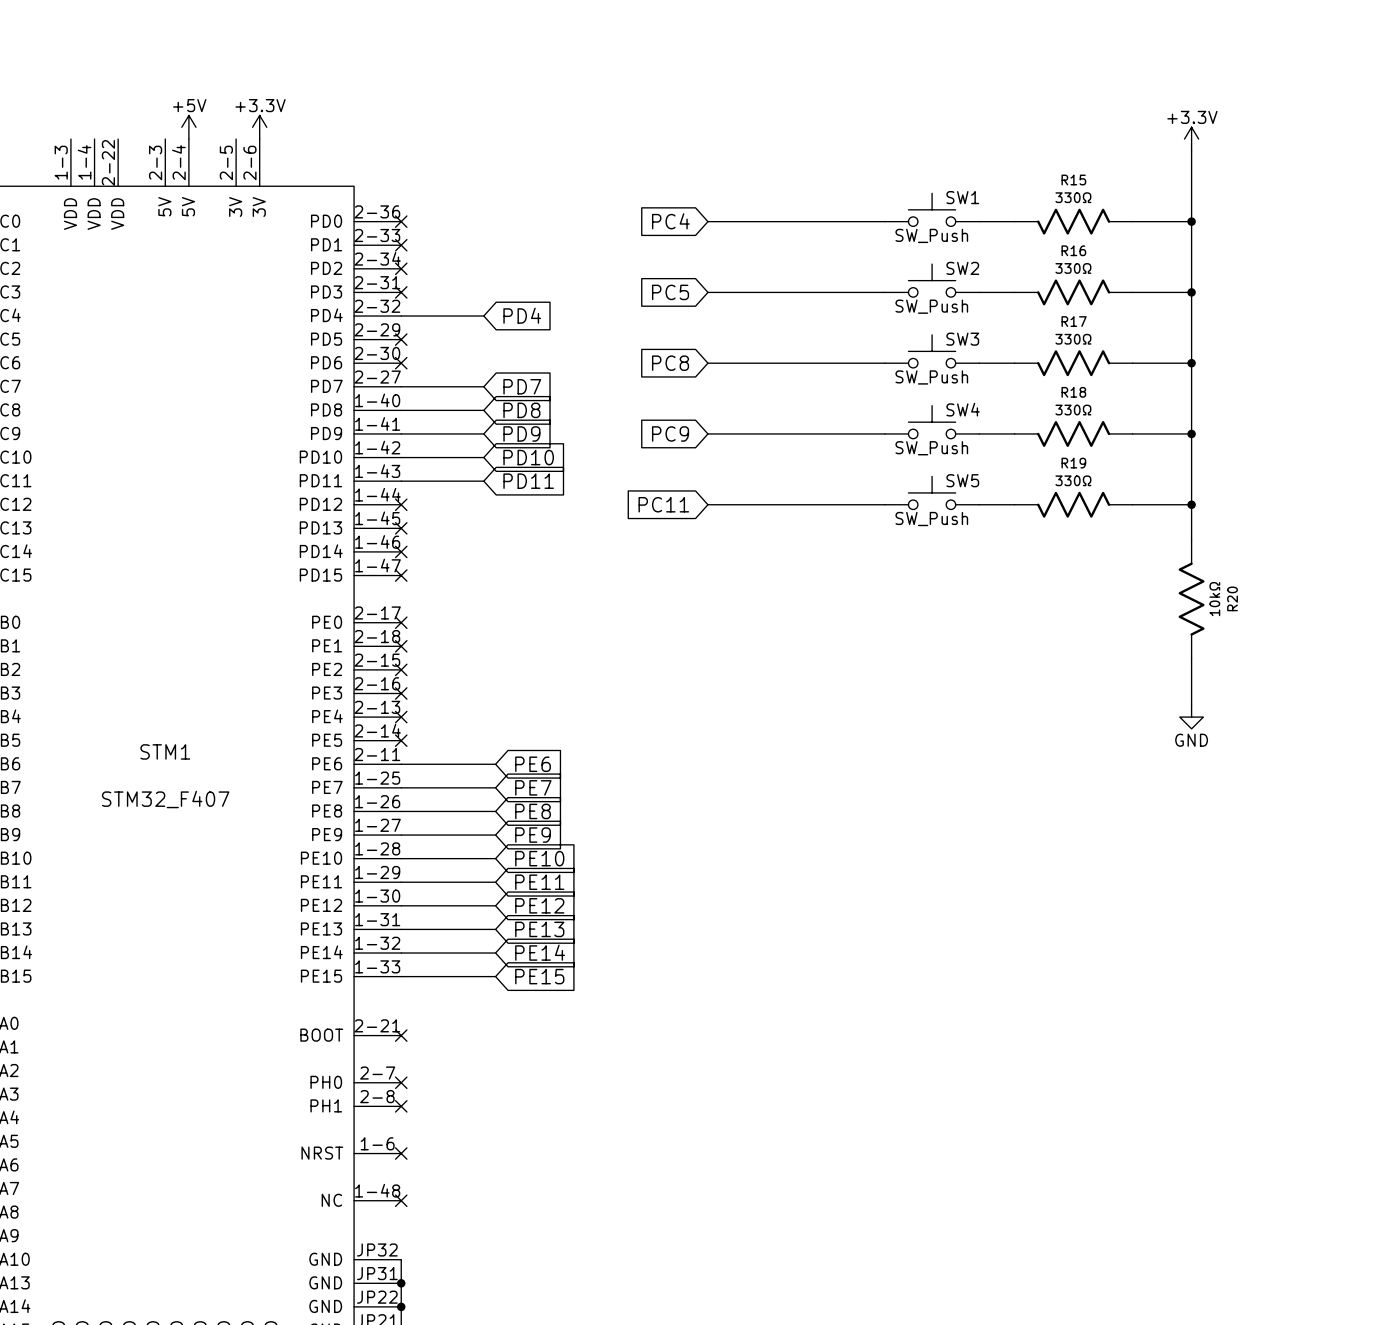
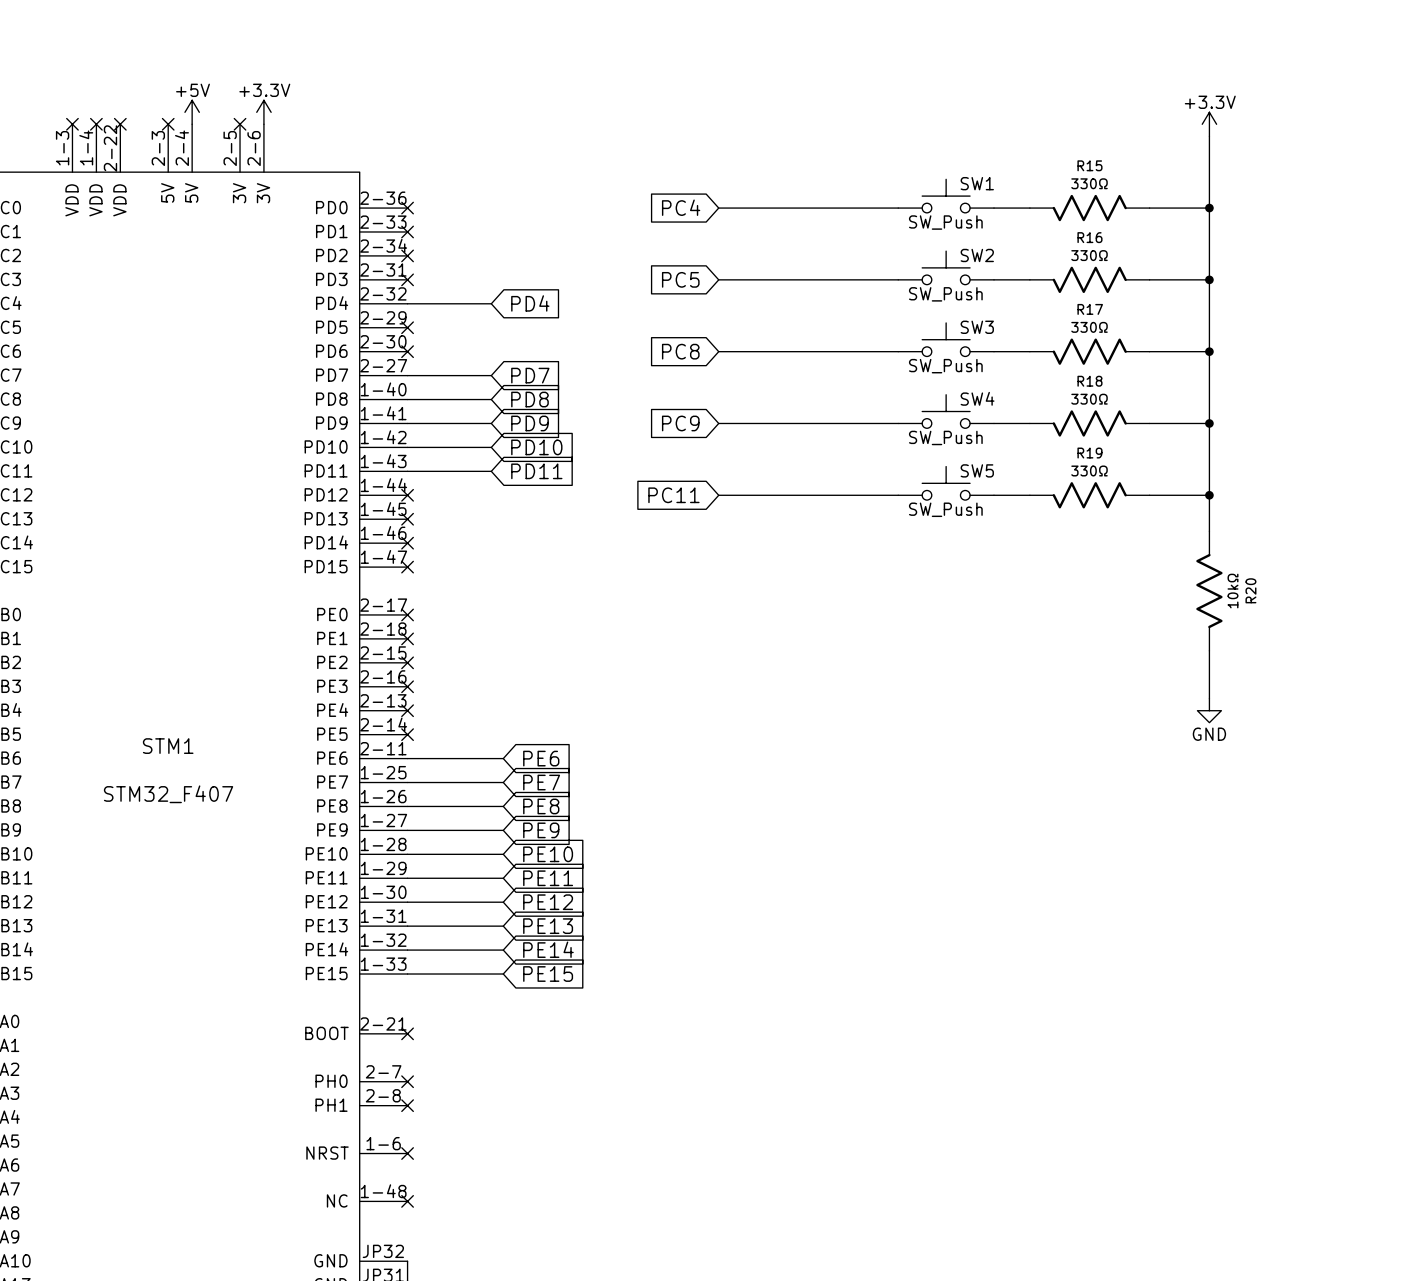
no-connect mark: none -> (72, 124)
no-connect mark: none -> (96, 124)
no-connect mark: none -> (120, 124)
no-connect mark: none -> (168, 124)
no-connect mark: none -> (240, 124)

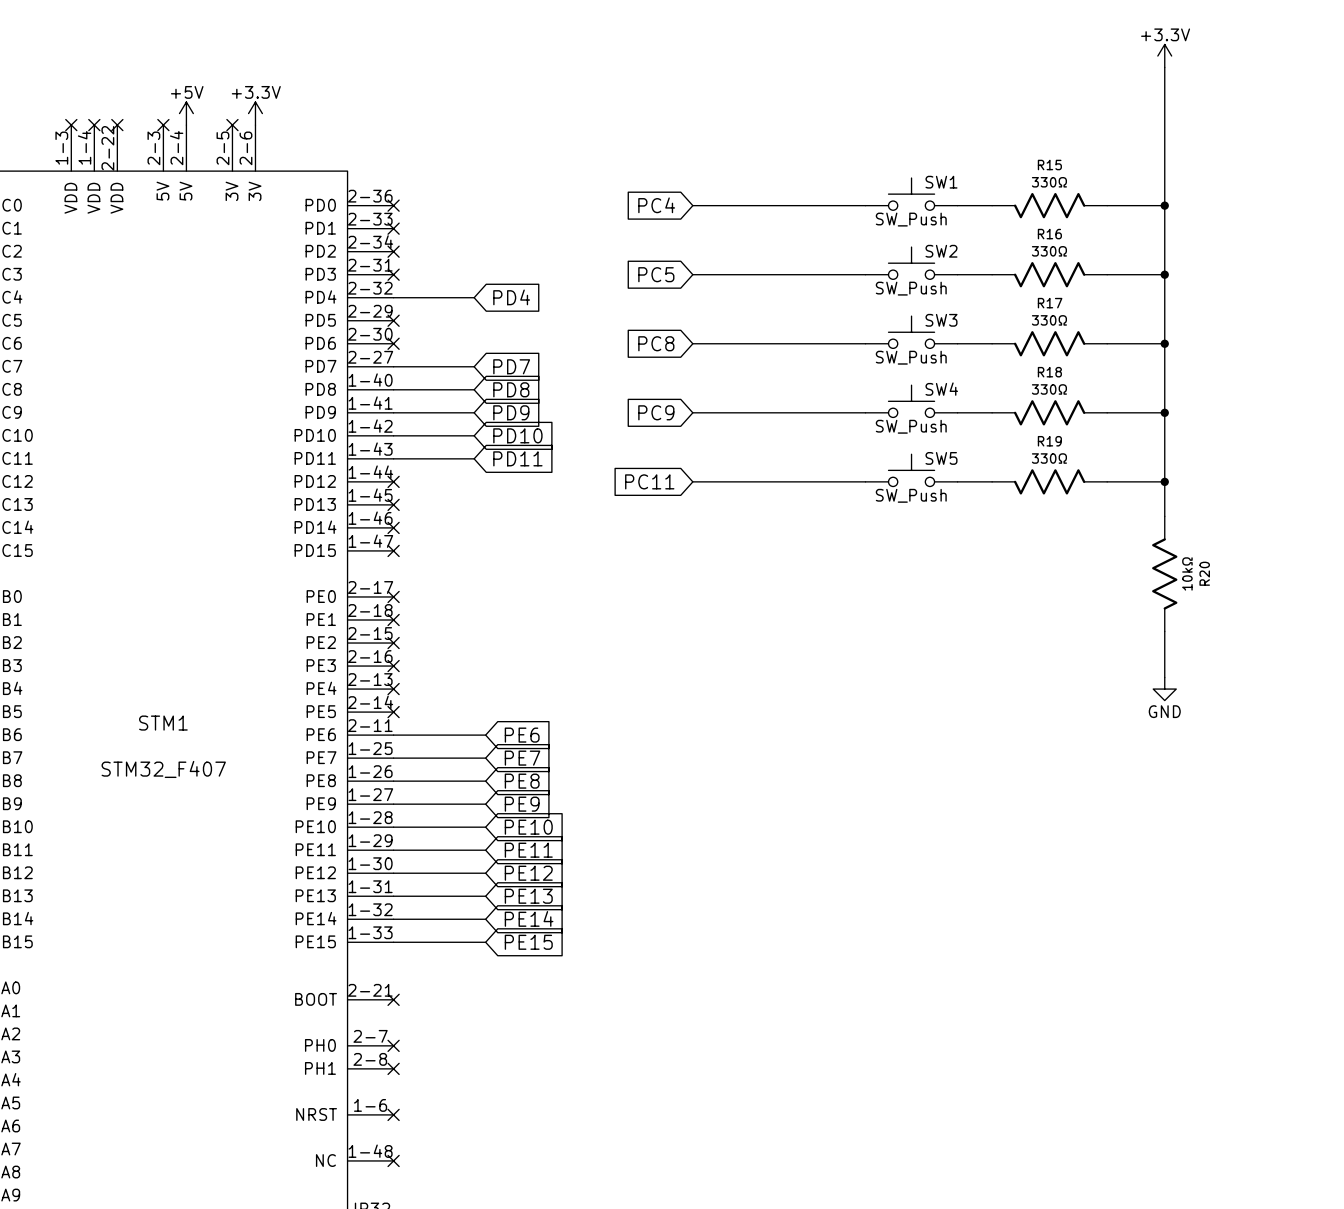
wire: none -> (1164, 67) (1164, 136)
power symbol position: +3.3V (1209, 124) -> +3.3V (1164, 56)

